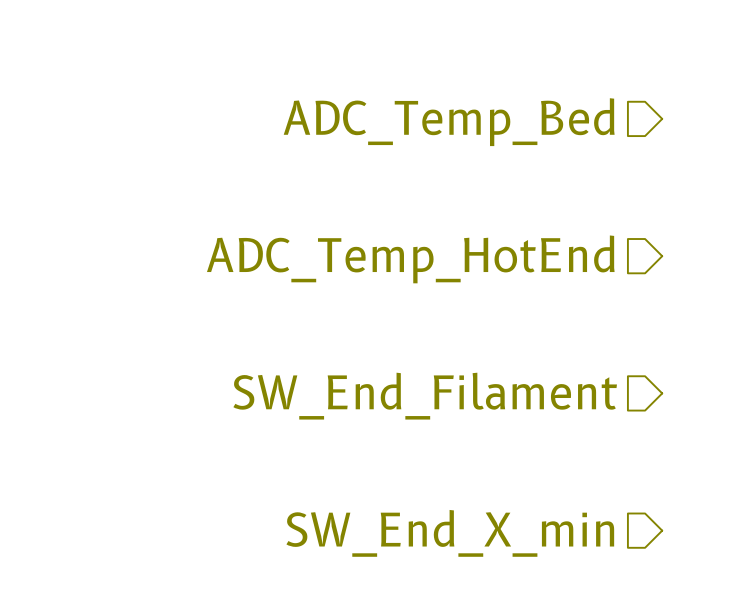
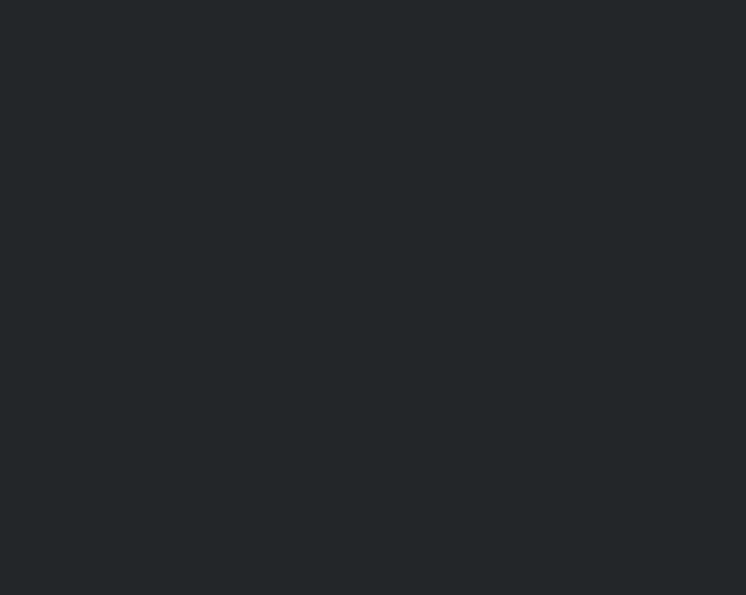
hierarchical label: ADC_Temp_Bed (449, 122) -> none
hierarchical label: ADC_Temp_HotEnd (410, 259) -> none
hierarchical label: SW_End_Filament (425, 396) -> none
hierarchical label: SW_End_X_min (450, 533) -> none

